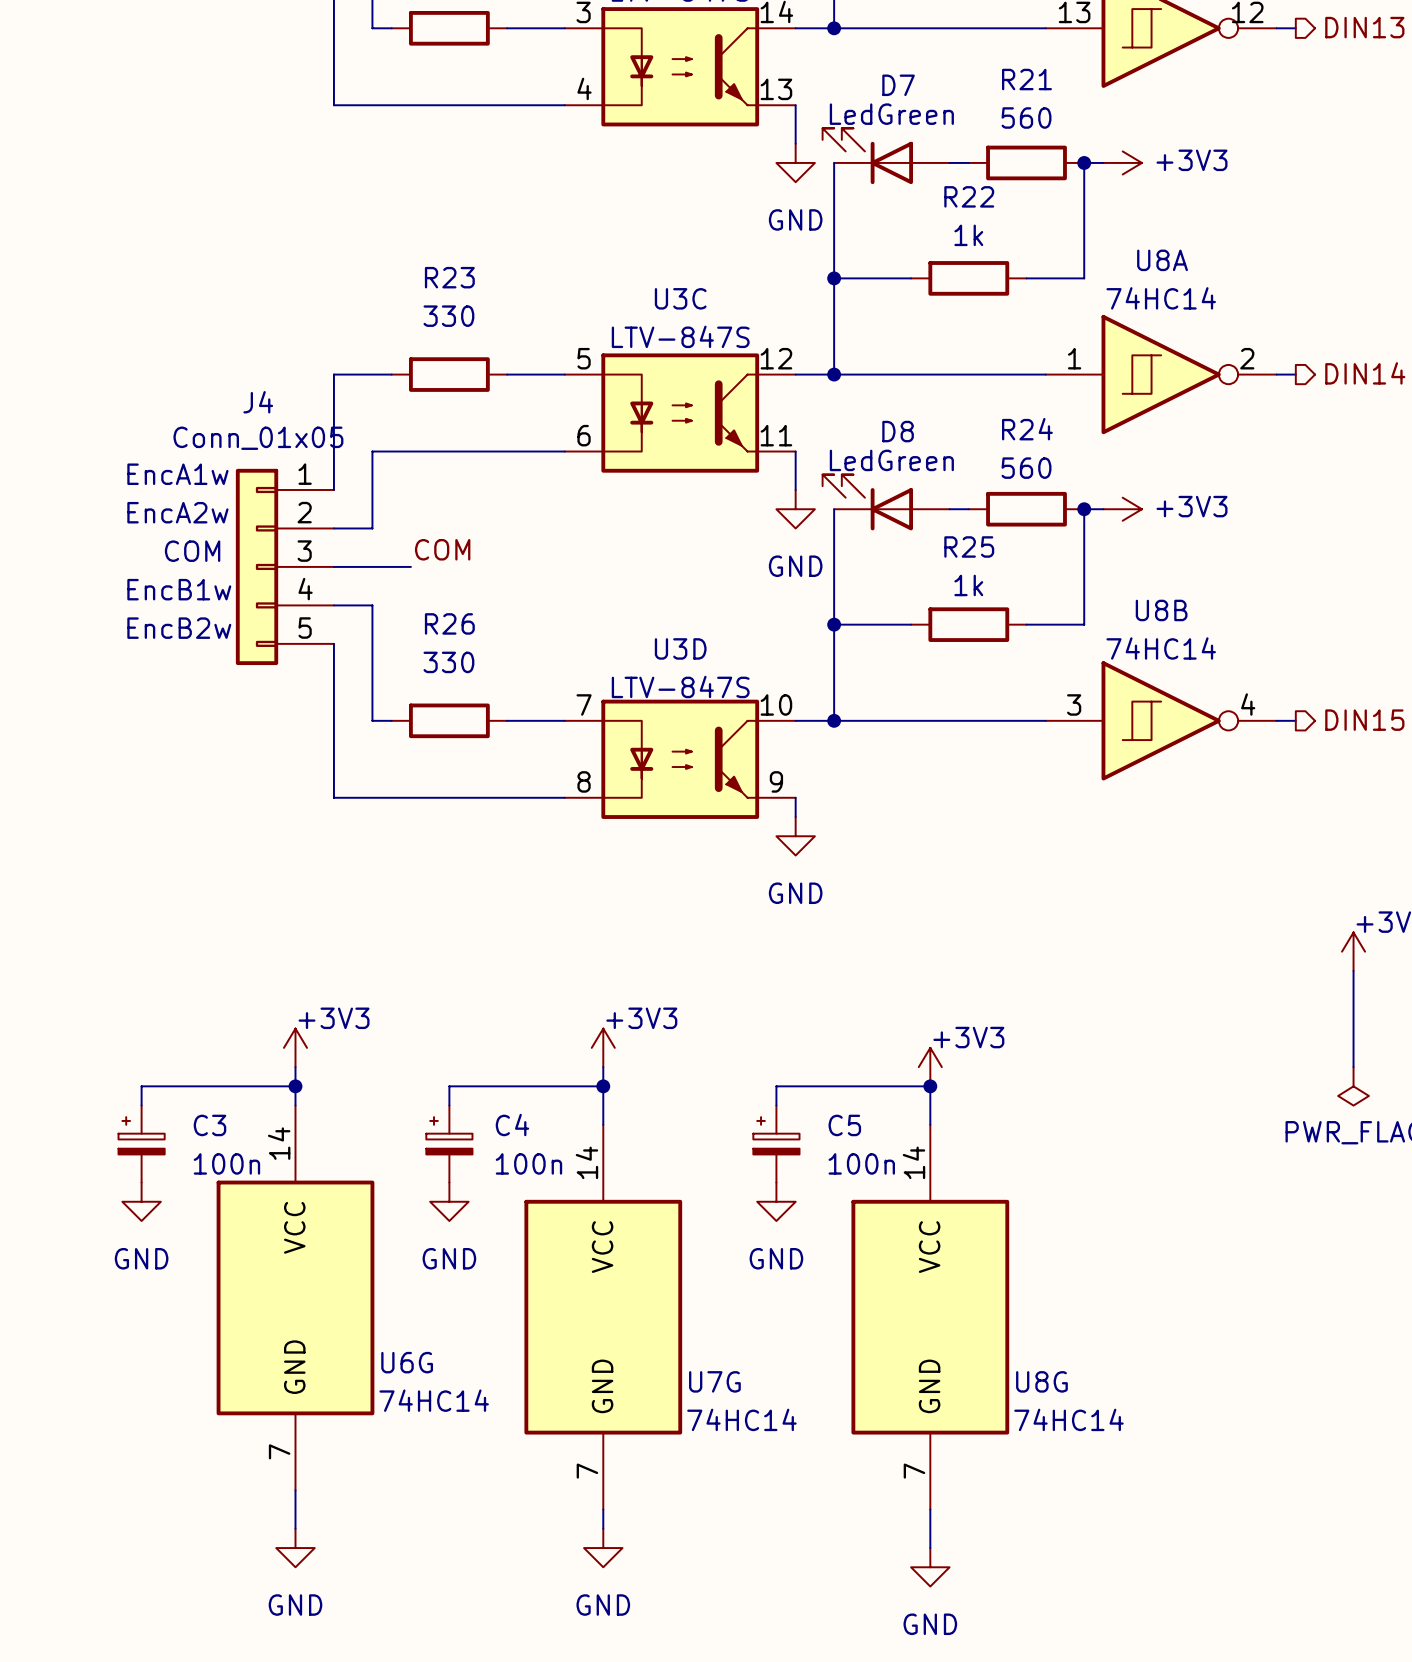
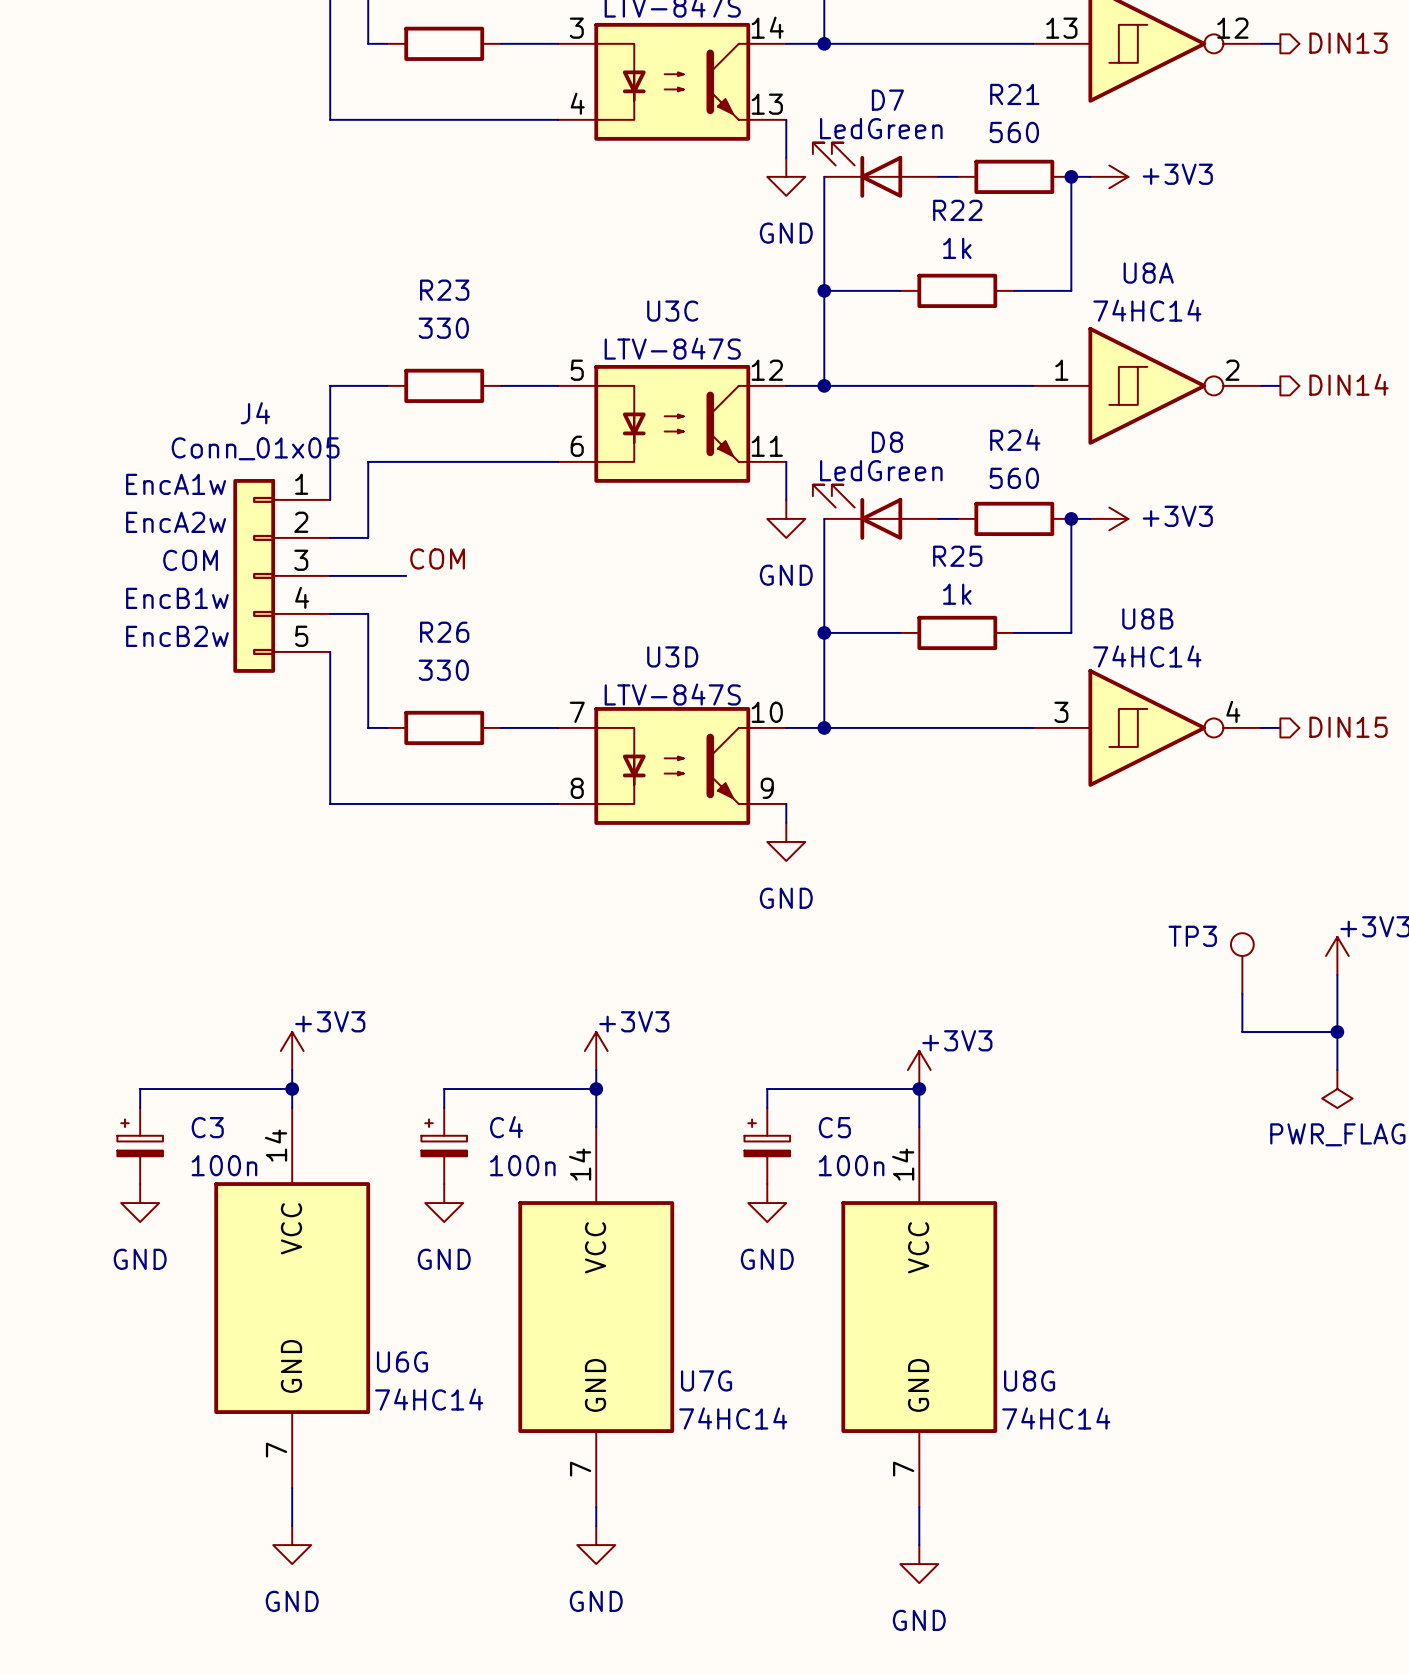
TP3: none -> (1242, 963)
wire: none -> (1242, 994) (1242, 1032) (1337, 1032)
junction: none -> (1337, 1032)

